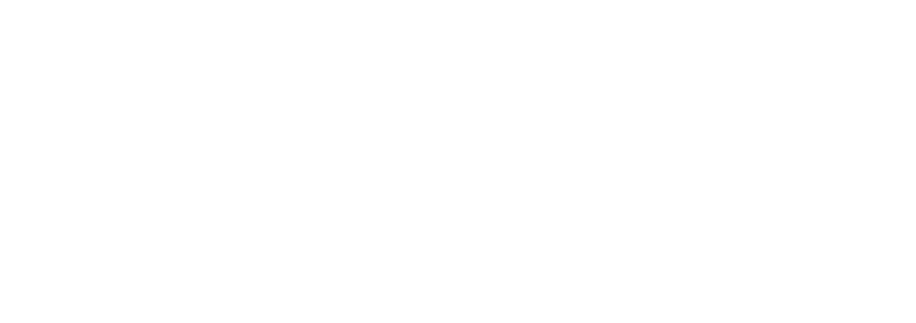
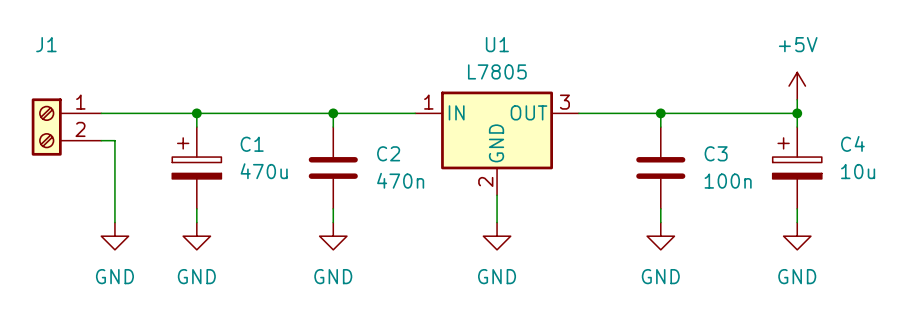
power symbol: none -> +5V (797, 86)
wire: none -> (797, 99) (797, 127)
wire: none -> (101, 113) (415, 113)
wire: none -> (196, 113) (196, 127)
junction: none -> (196, 113)
wire: none -> (333, 113) (333, 127)
junction: none -> (333, 113)
wire: none -> (578, 113) (797, 113)
wire: none -> (660, 113) (660, 127)
junction: none -> (660, 113)
junction: none -> (797, 113)
J1: none -> (66, 127)
wire: none -> (101, 140) (114, 140) (114, 222)
U1: none -> L7805 (497, 143)
C1: none -> 470u (196, 167)
C2: none -> 470n (333, 167)
C3: none -> 100n (660, 167)
C4: none -> 10u (797, 167)
wire: none -> (497, 195) (497, 222)
wire: none -> (196, 208) (196, 222)
wire: none -> (333, 208) (333, 222)
wire: none -> (660, 208) (660, 222)
wire: none -> (797, 208) (797, 222)
power symbol: none -> GND (114, 236)
power symbol: none -> GND (196, 236)
power symbol: none -> GND (333, 236)
power symbol: none -> GND (497, 236)
power symbol: none -> GND (660, 236)
power symbol: none -> GND (797, 236)

